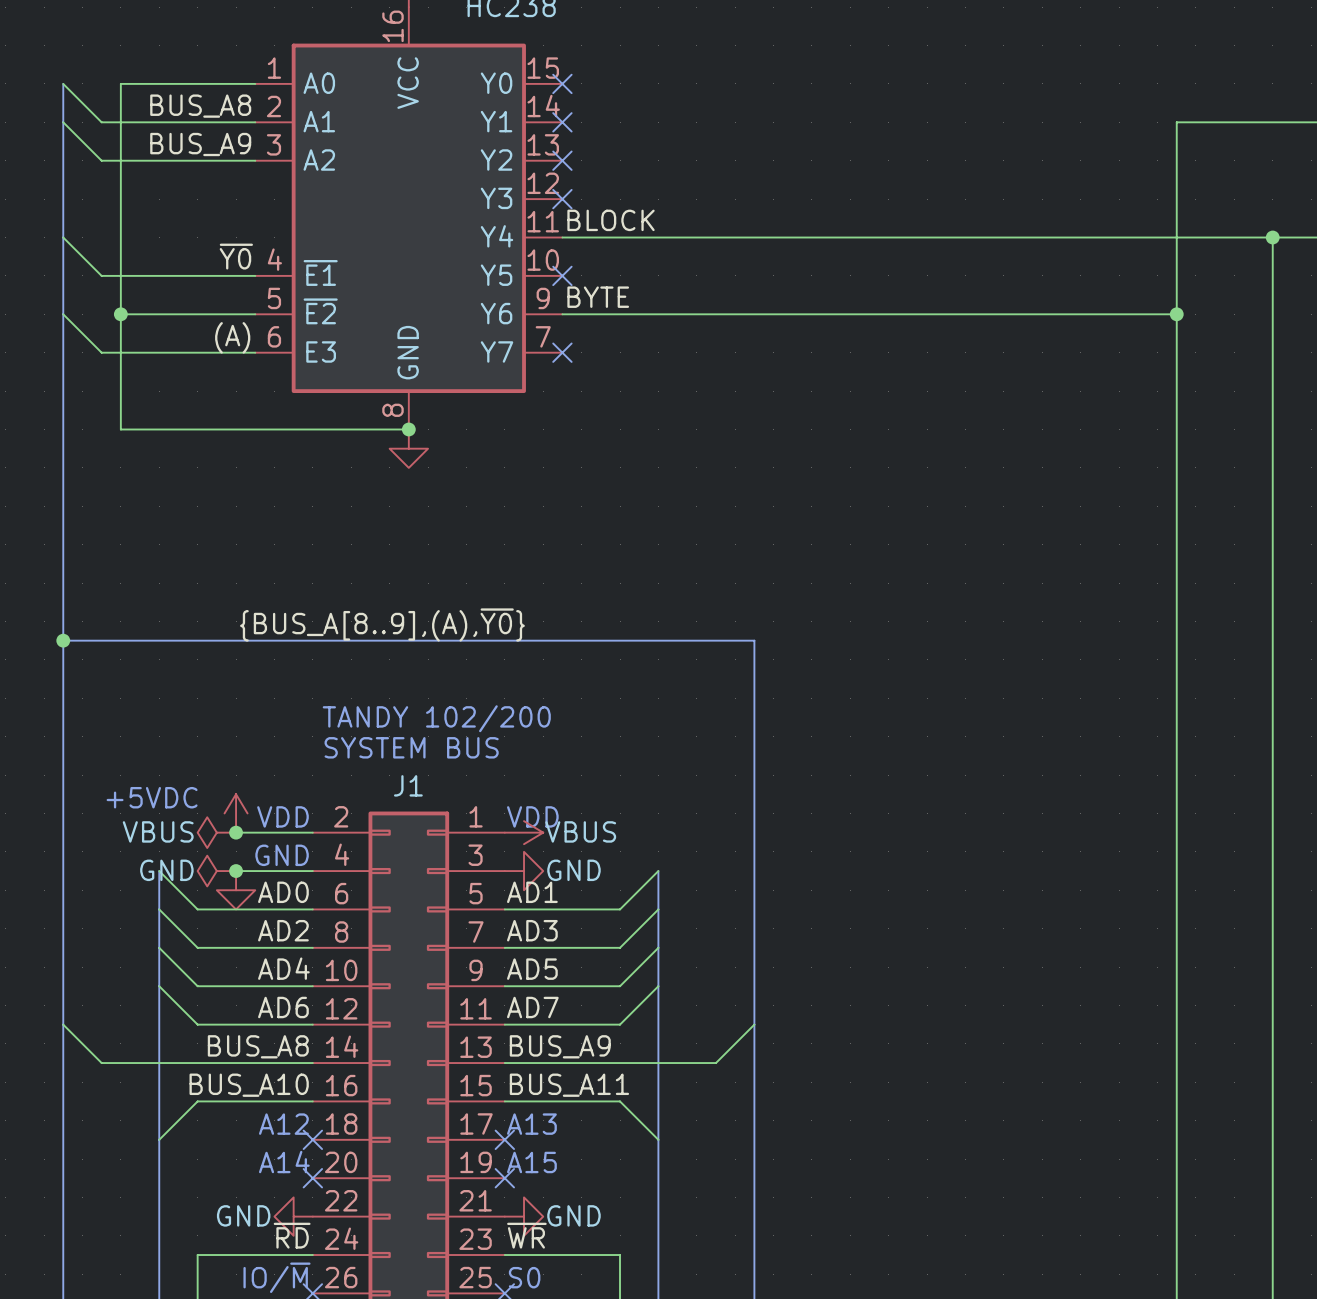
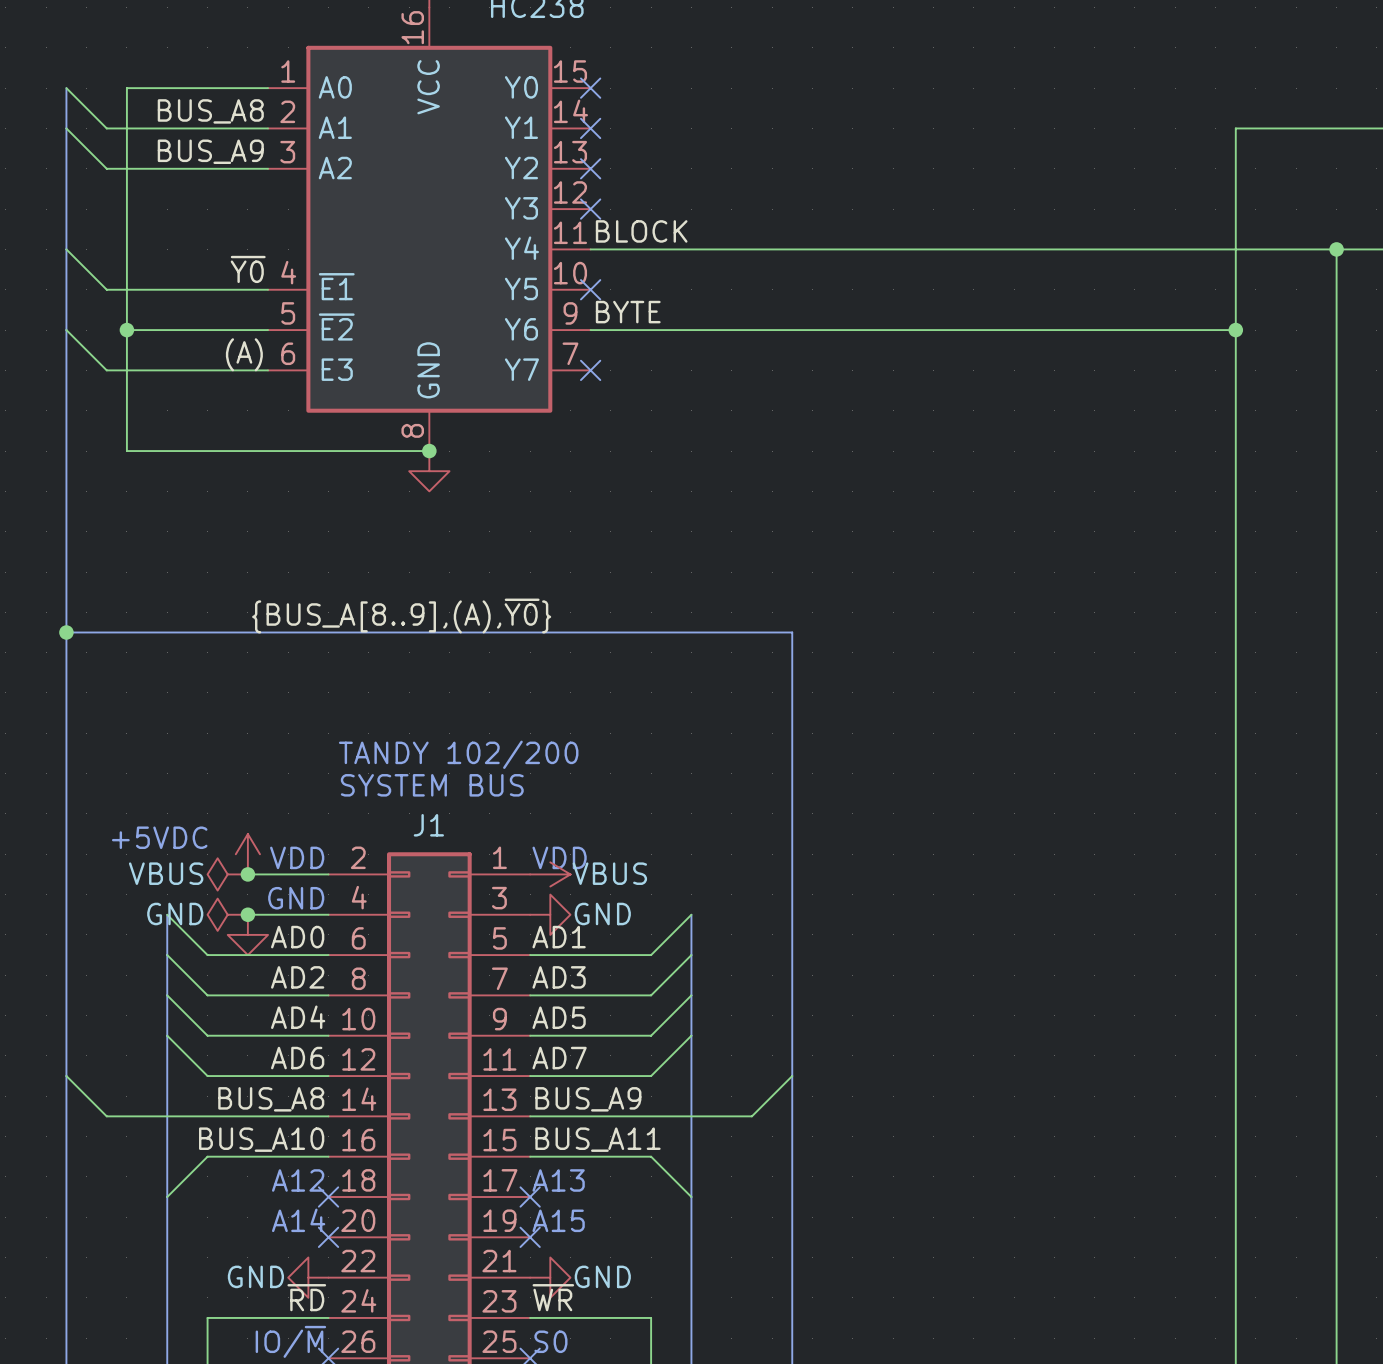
label position: {BUS_A[8..9],(A),~{Y0}} (382, 624) -> {BUS_A[8..9],(A),~{Y0}} (401, 616)
bus: (63, 640) (754, 640) -> (66, 632) (792, 632) (792, 672)
junction position: (63, 640) -> (66, 632)

